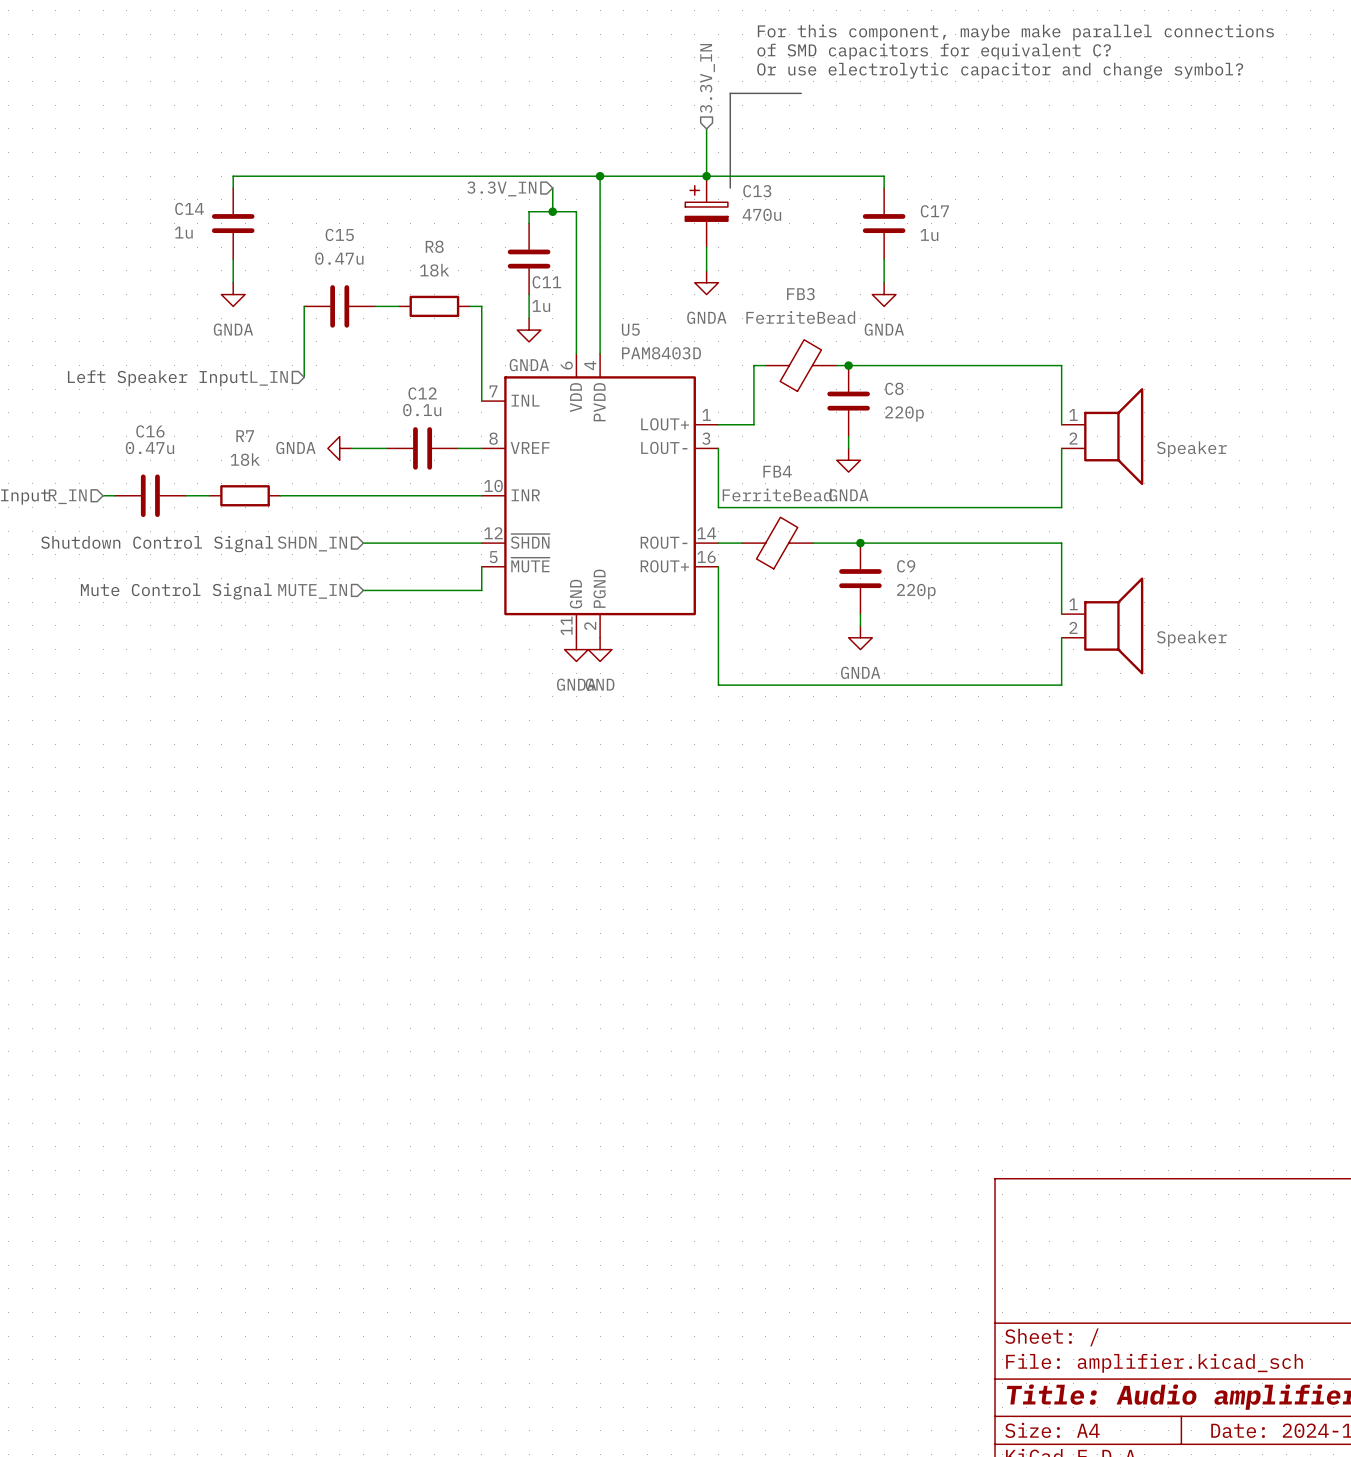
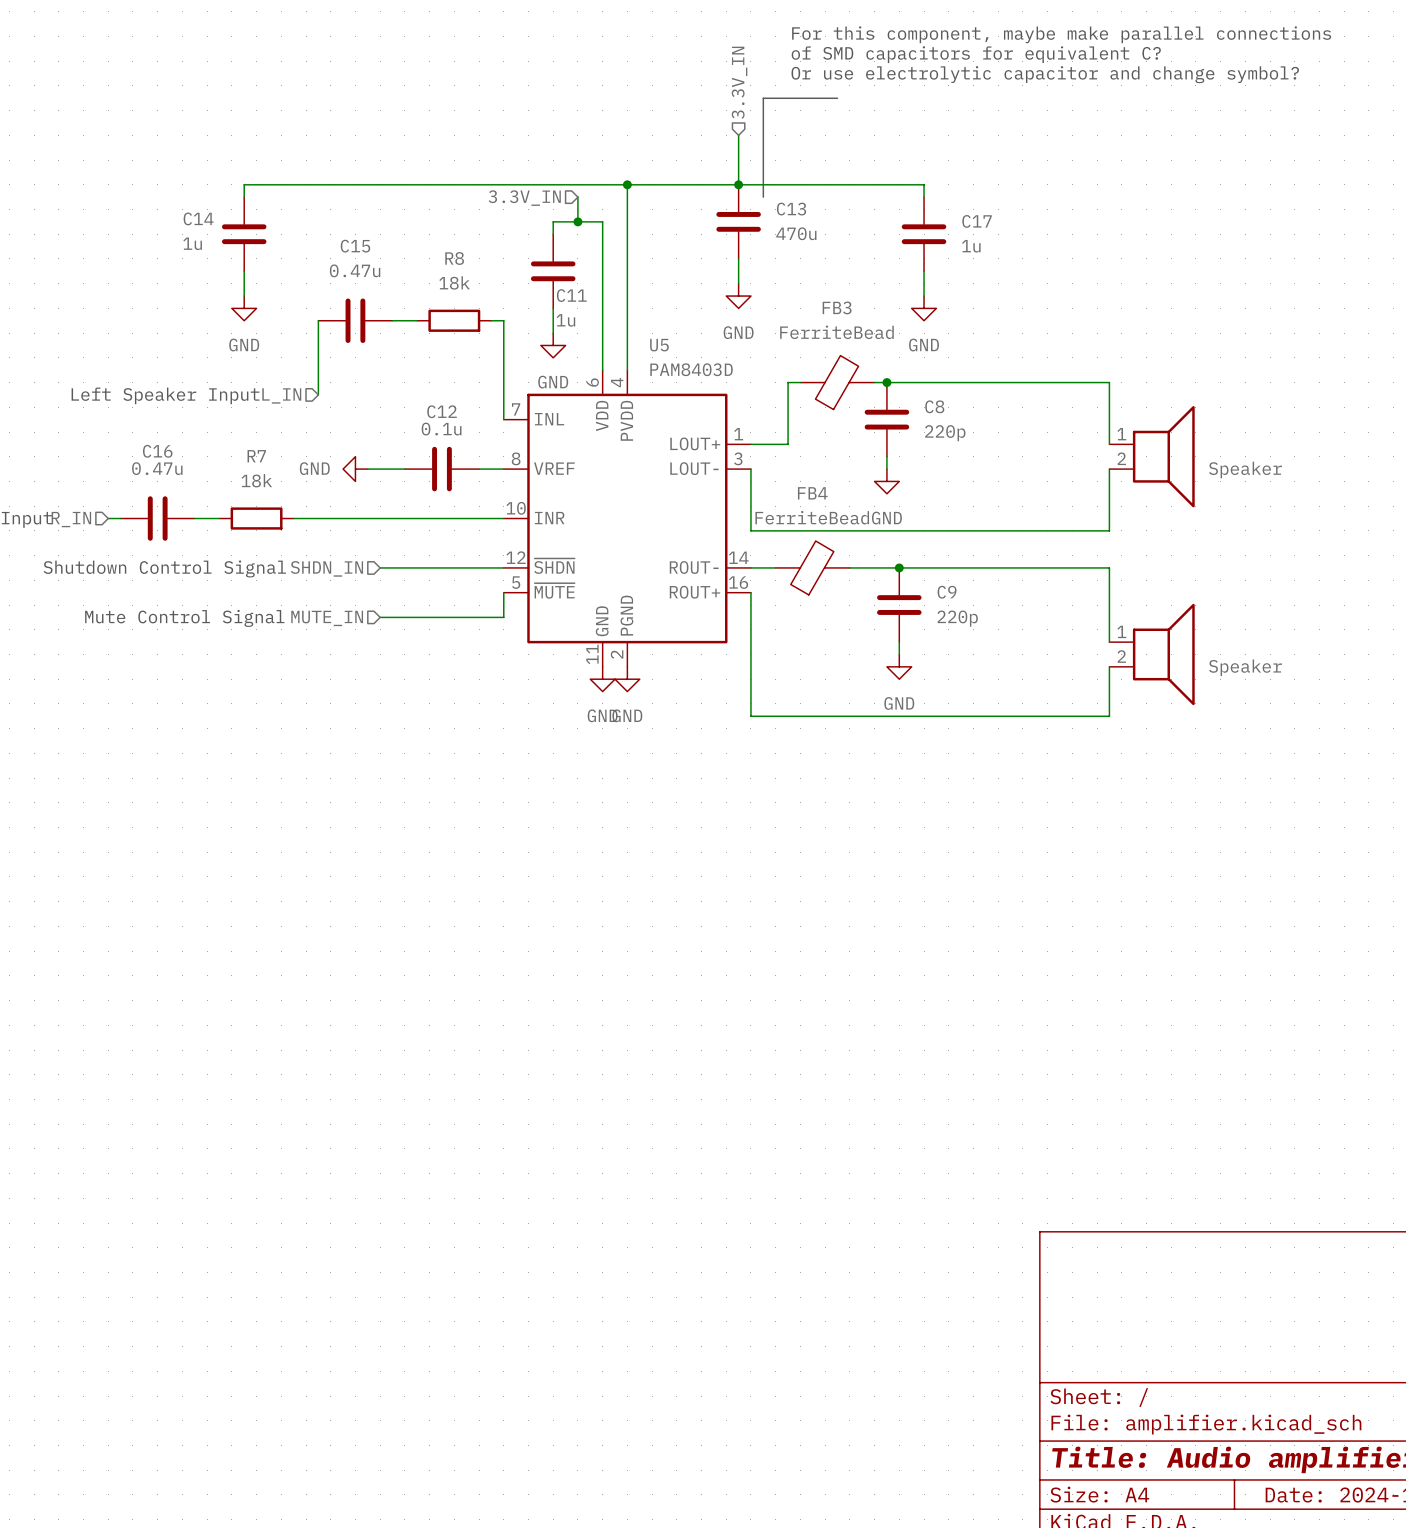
C13 symbol: [685, 176, 728, 248] -> [716, 184, 761, 259]
power symbol: GNDA (706, 282) -> GND (738, 296)
power symbol: GNDA (233, 294) -> GND (244, 308)
power symbol: GNDA (884, 294) -> GND (924, 308)
power symbol: GNDA (529, 330) -> GND (553, 345)
power symbol: GNDA (339, 448) -> GND (355, 469)
power symbol: GNDA (848, 460) -> GND (886, 481)
power symbol: GNDA (860, 637) -> GND (899, 666)
power symbol: GNDA (576, 649) -> GND (602, 679)

